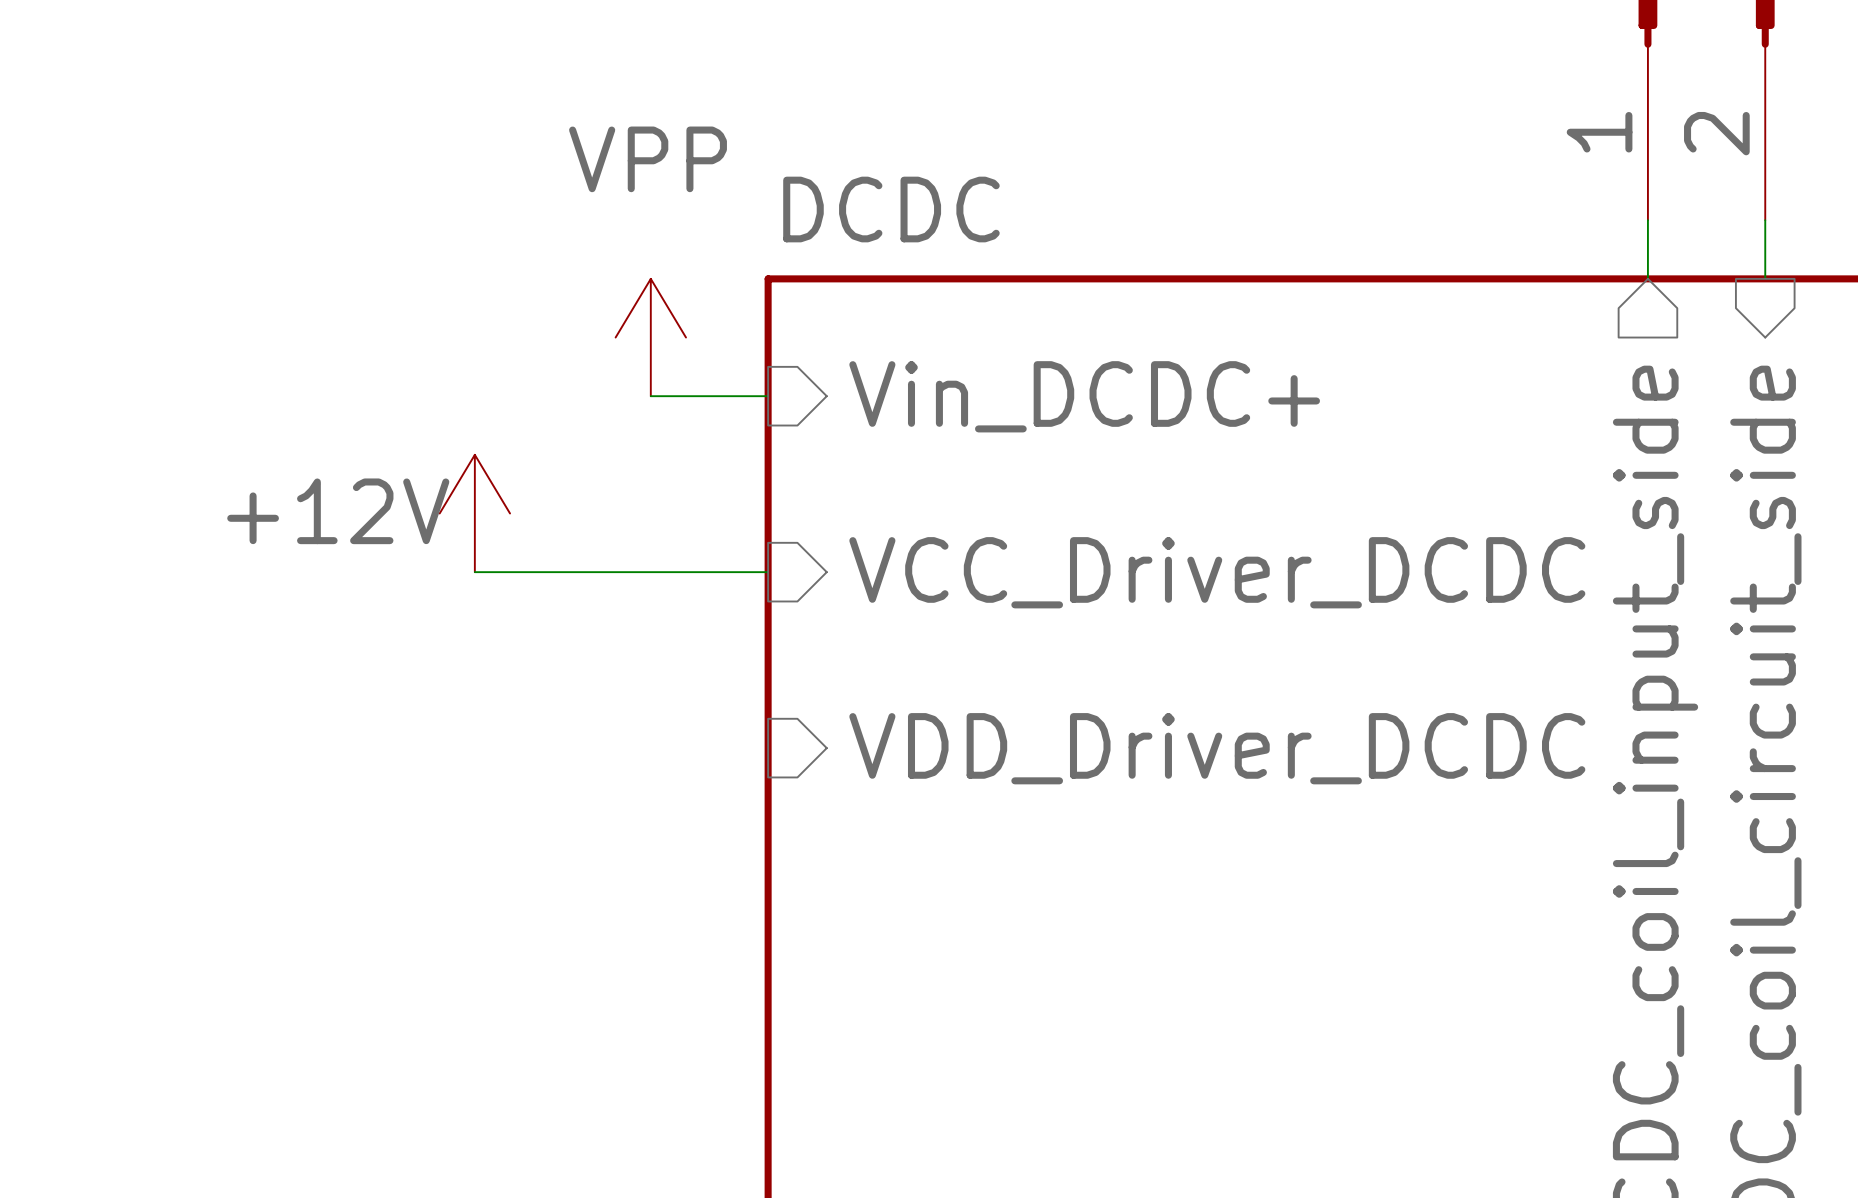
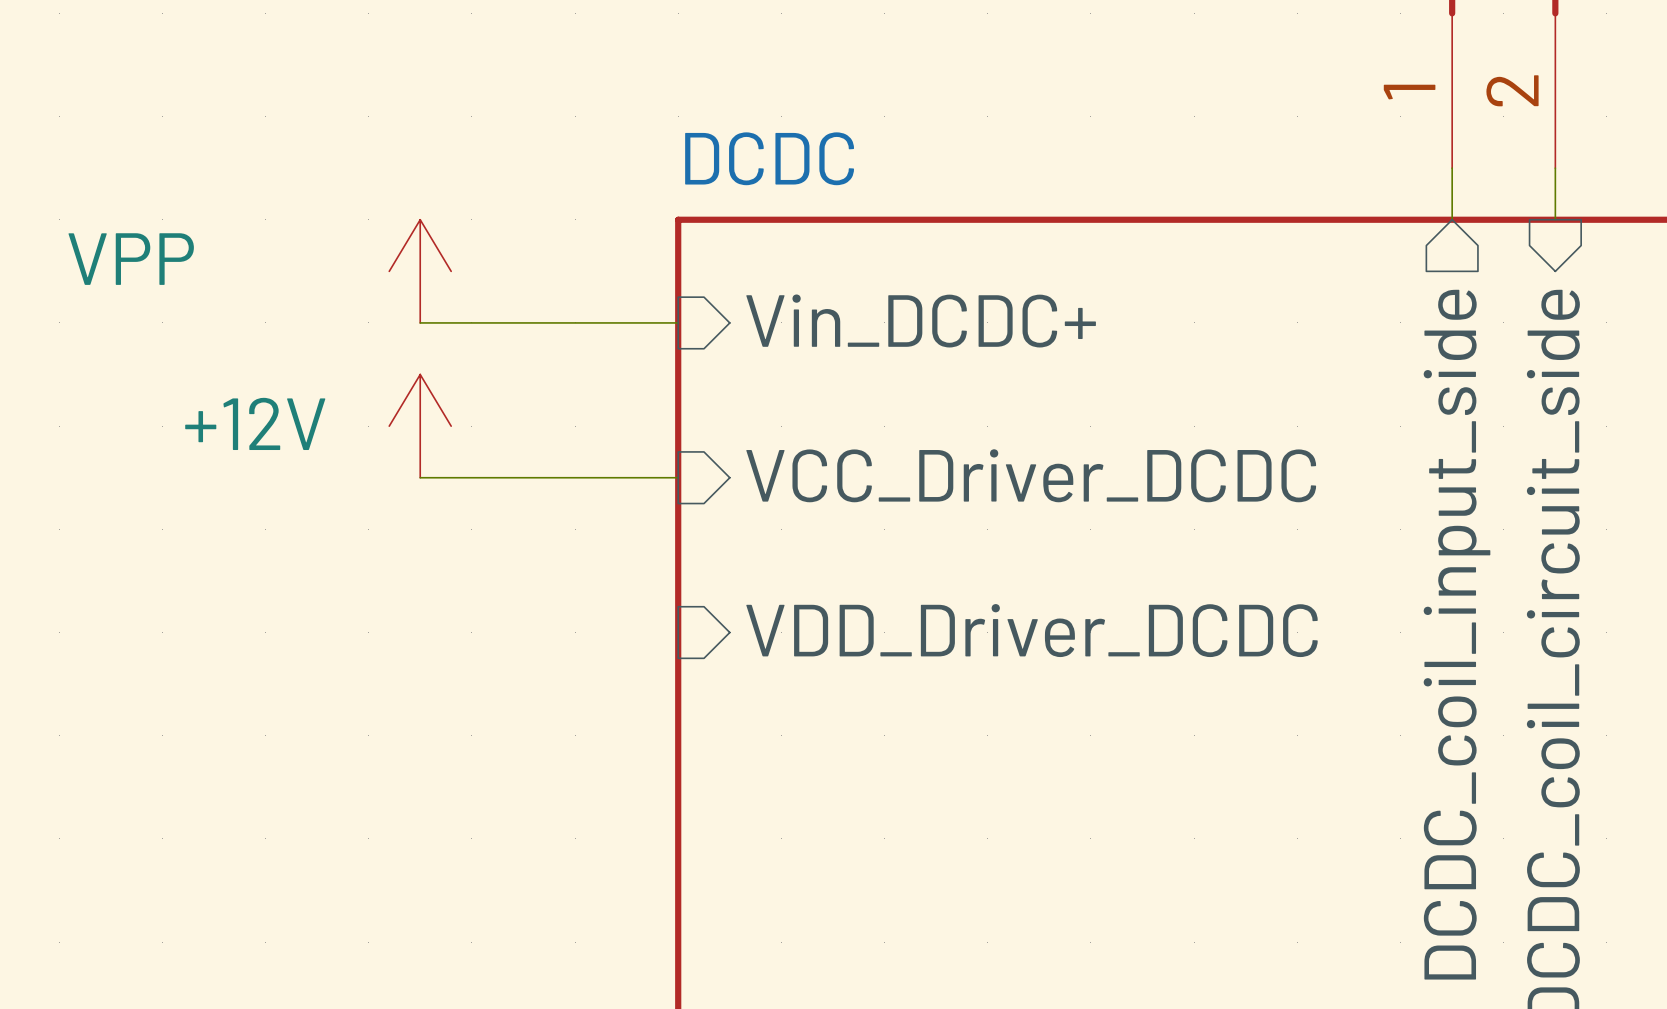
power symbol text position: VPP (648, 159) -> VPP (131, 259)
power symbol position: VPP (650, 337) -> VPP (420, 271)
wire: none -> (420, 322) (575, 322)
power symbol text position: +12V (338, 511) -> +12V (255, 423)

